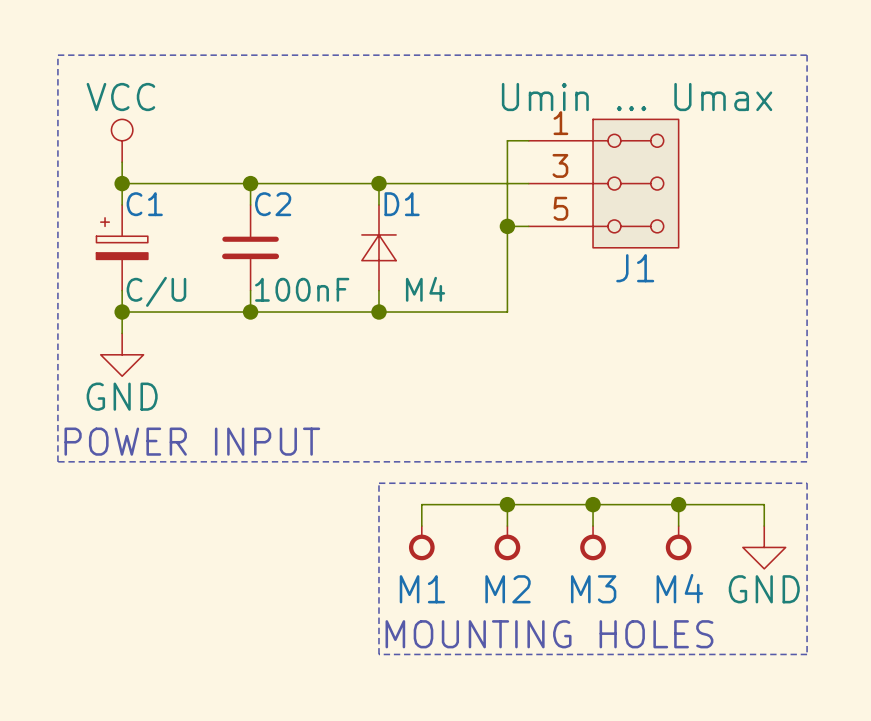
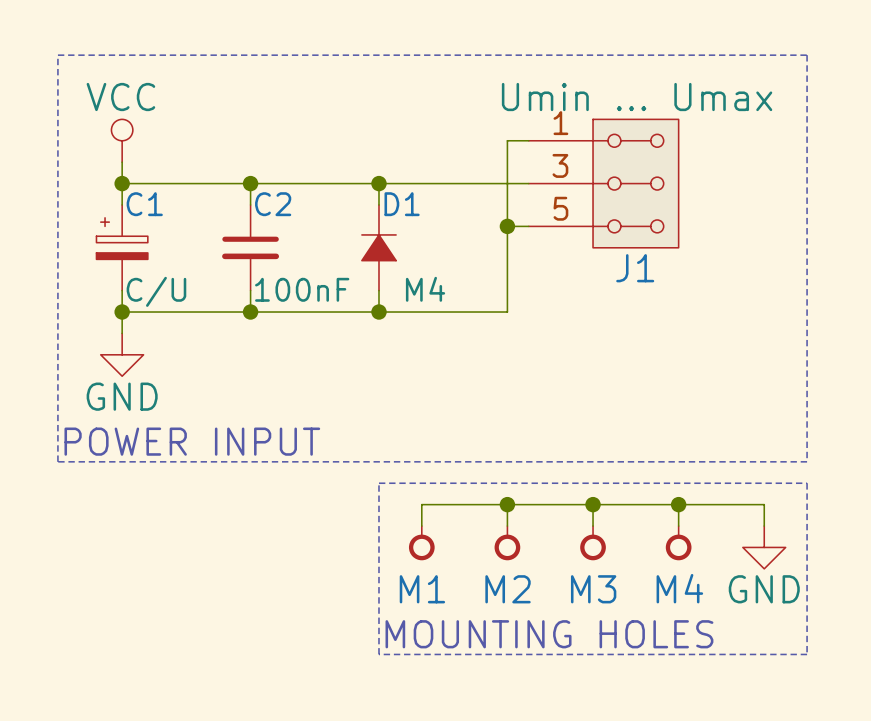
D1 symbol: [361, 204, 397, 291] -> [361, 204, 397, 291]

